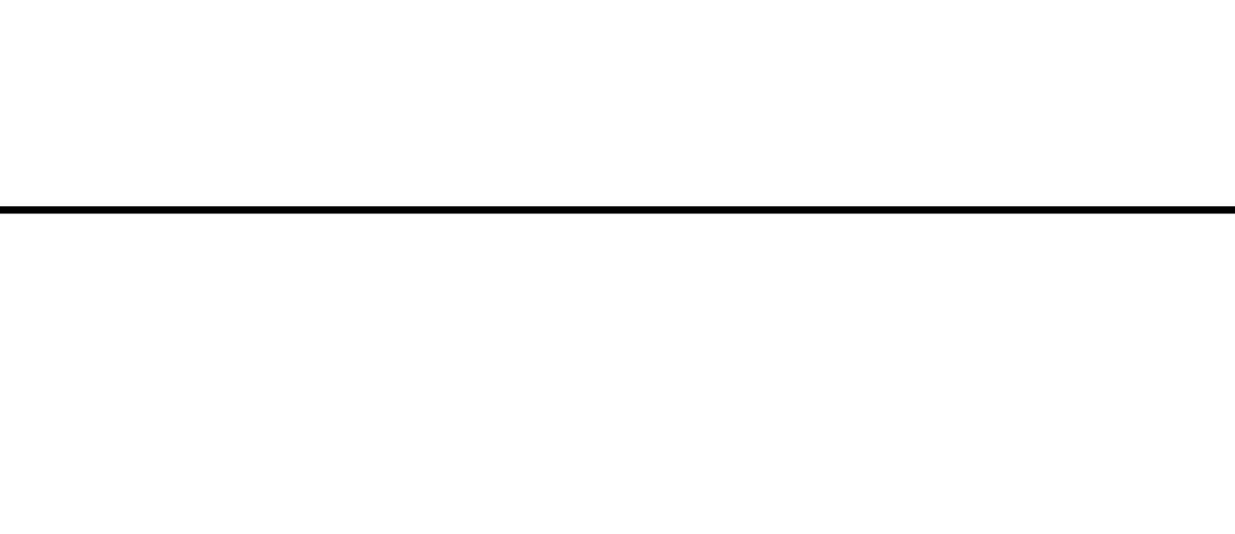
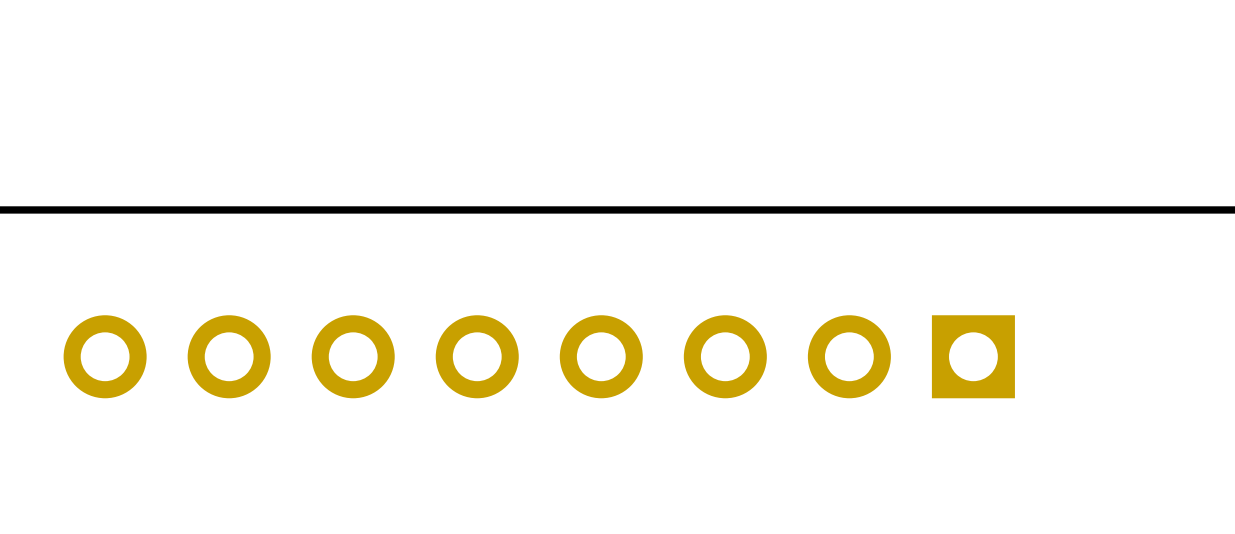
part: none -> (539, 356)

